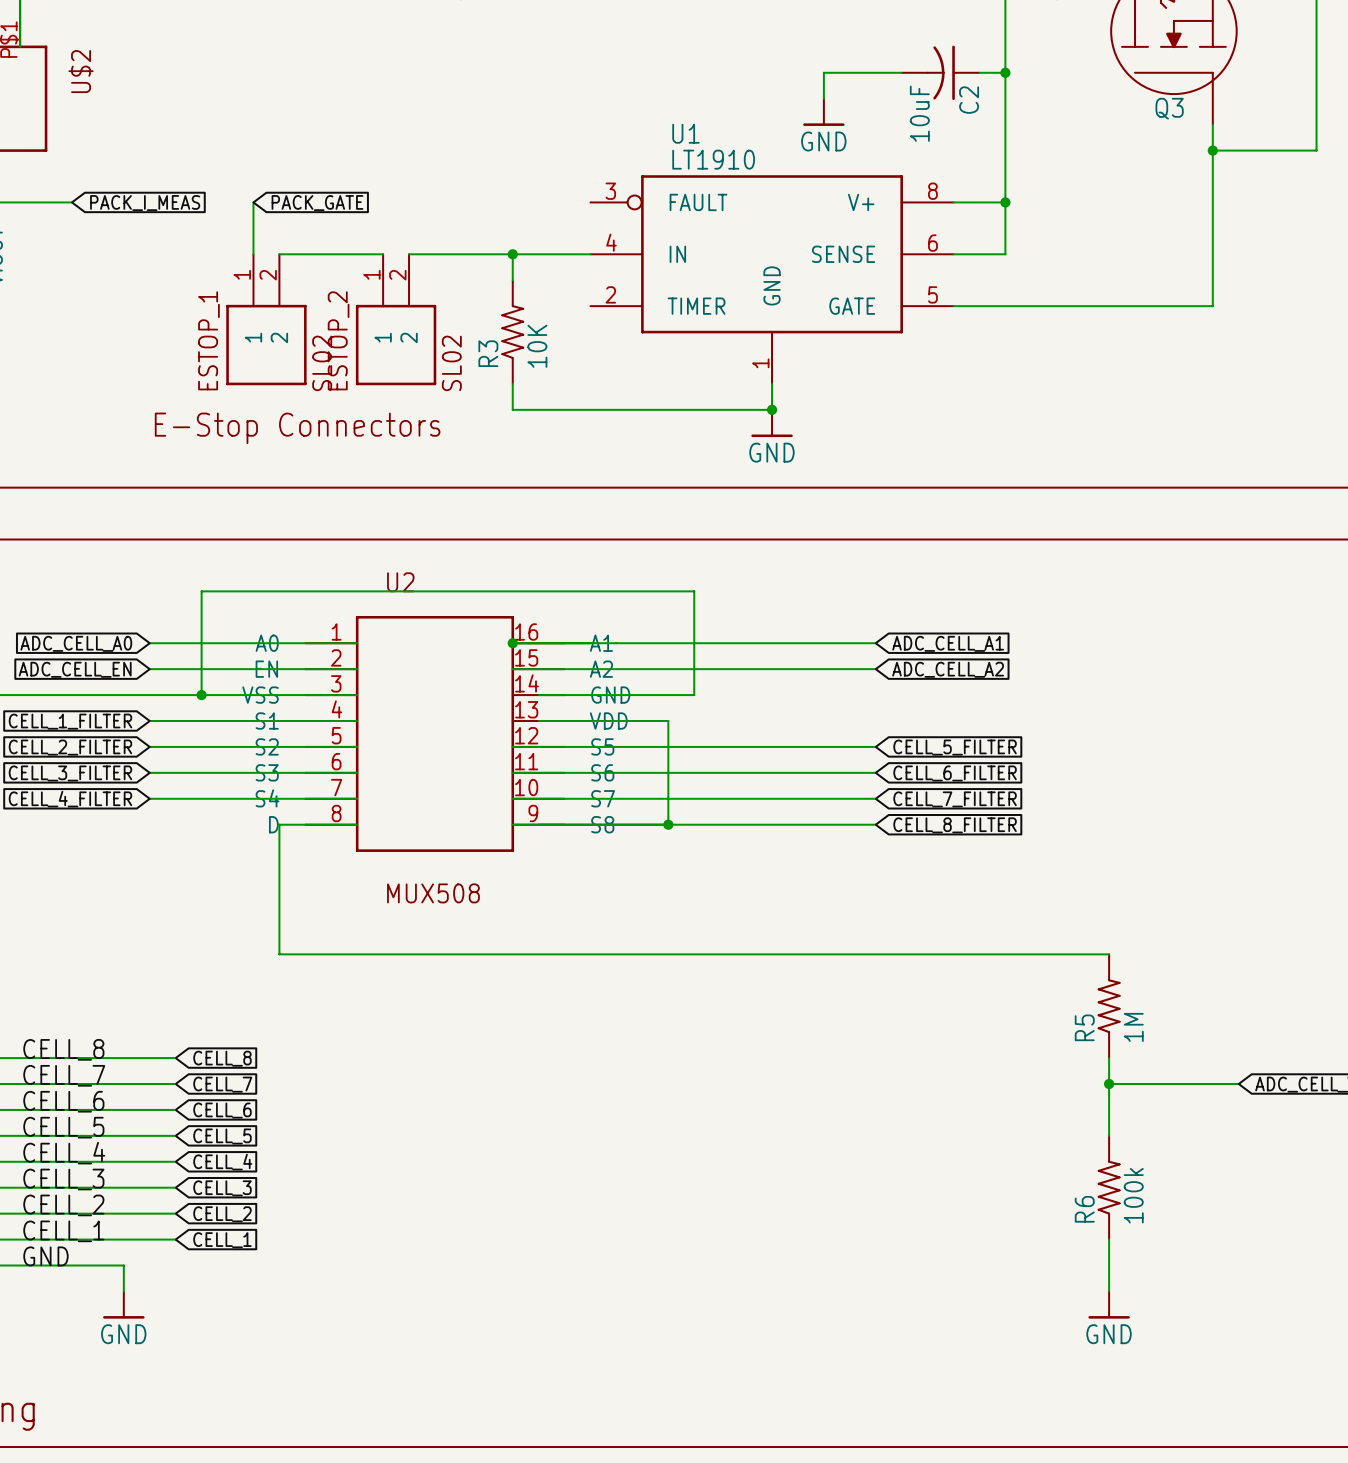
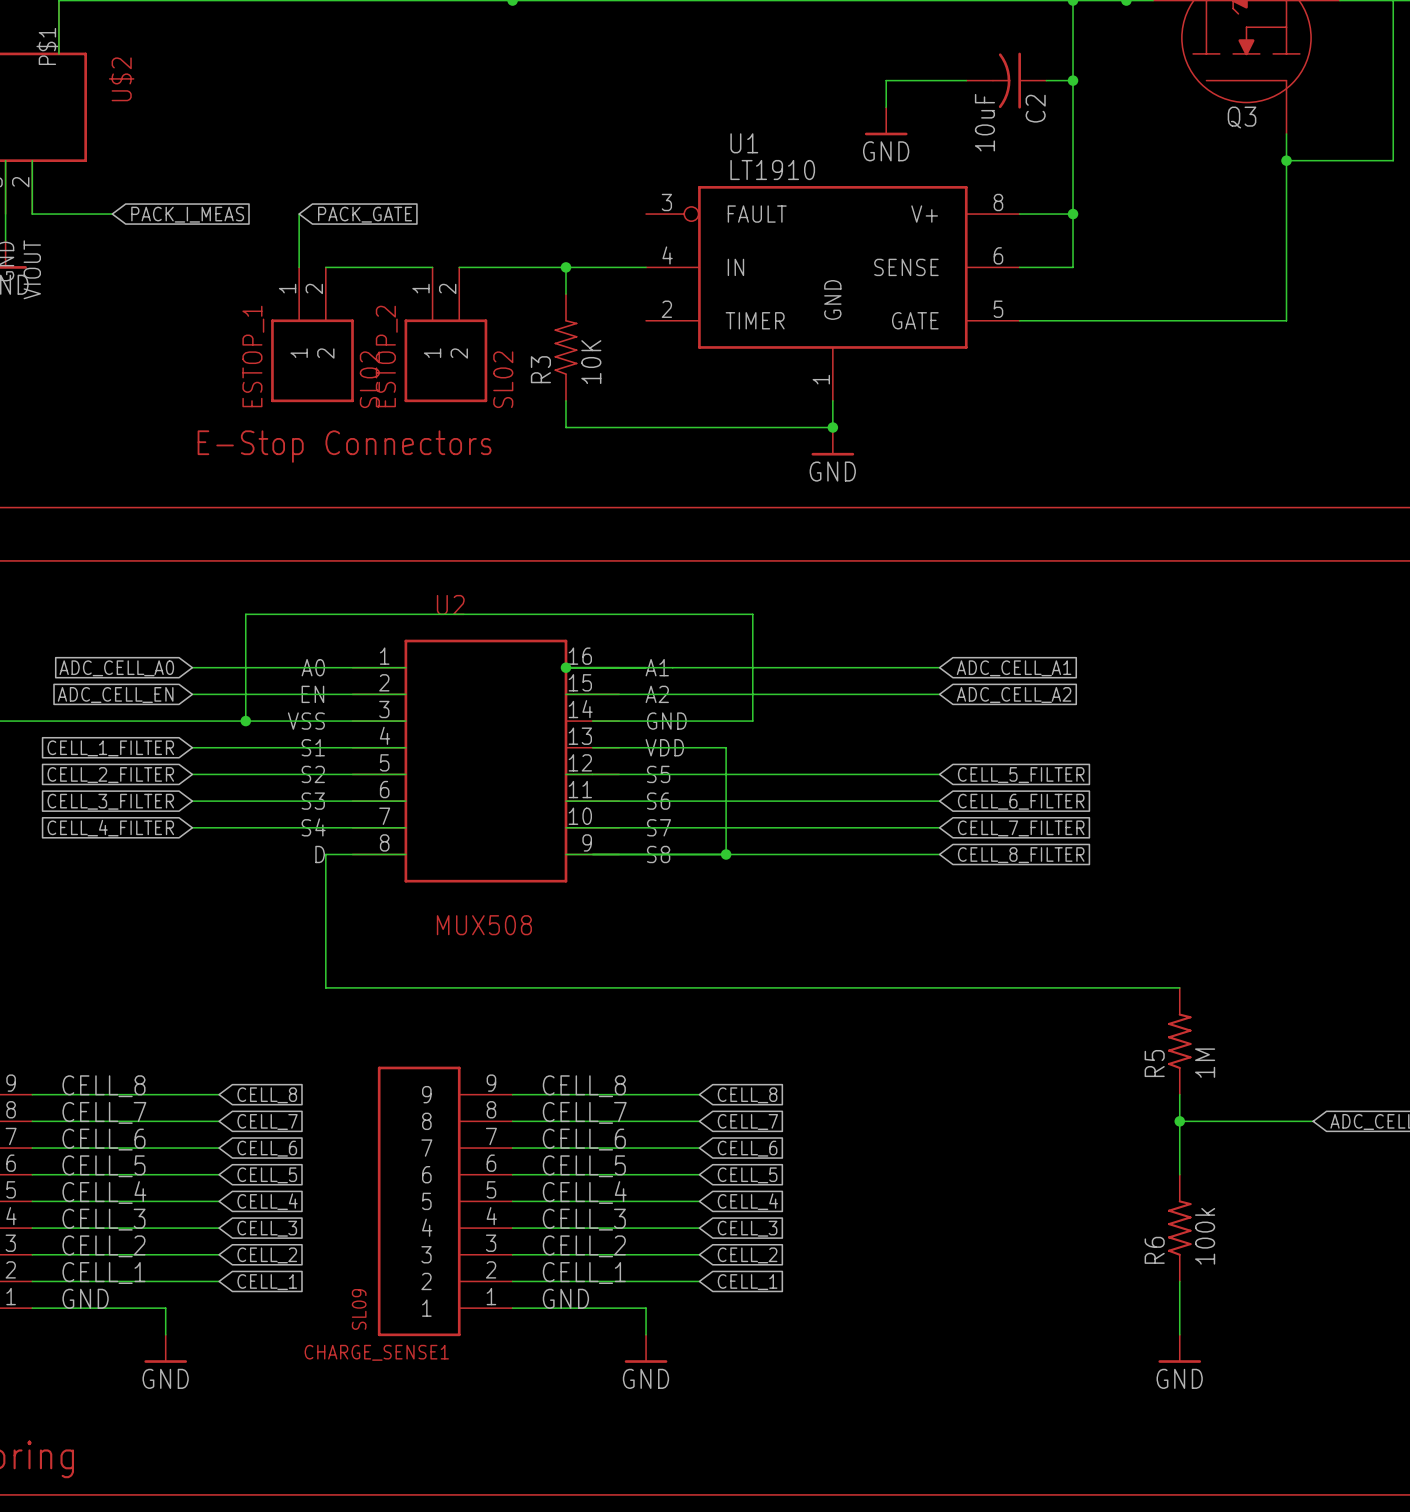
label: none -> CELL_8 (584, 1086)
wire: none -> (512, 1094) (699, 1094)
global label: none -> CELL_8 (747, 1095)
label: none -> CELL_7 (584, 1112)
wire: none -> (512, 1121) (699, 1121)
global label: none -> CELL_7 (747, 1121)
label: none -> CELL_6 (584, 1139)
wire: none -> (512, 1148) (699, 1148)
global label: none -> CELL_6 (747, 1148)
label: none -> CELL_5 (584, 1166)
wire: none -> (512, 1174) (699, 1174)
global label: none -> CELL_5 (747, 1175)
label: none -> CELL_4 (584, 1192)
CHARGE_SENSE1: none -> SL09 (445, 1201)
wire: none -> (512, 1201) (699, 1201)
global label: none -> CELL_4 (747, 1201)
label: none -> CELL_3 (584, 1219)
wire: none -> (512, 1228) (699, 1228)
global label: none -> CELL_3 (747, 1228)
label: none -> CELL_2 (584, 1246)
wire: none -> (512, 1254) (699, 1254)
global label: none -> CELL_2 (747, 1255)
label: none -> CELL_1 (584, 1273)
wire: none -> (512, 1281) (699, 1281)
global label: none -> CELL_1 (747, 1282)
label: none -> GND (565, 1298)
wire: none -> (512, 1308) (646, 1308) (646, 1334)
power symbol: none -> GND (646, 1348)

